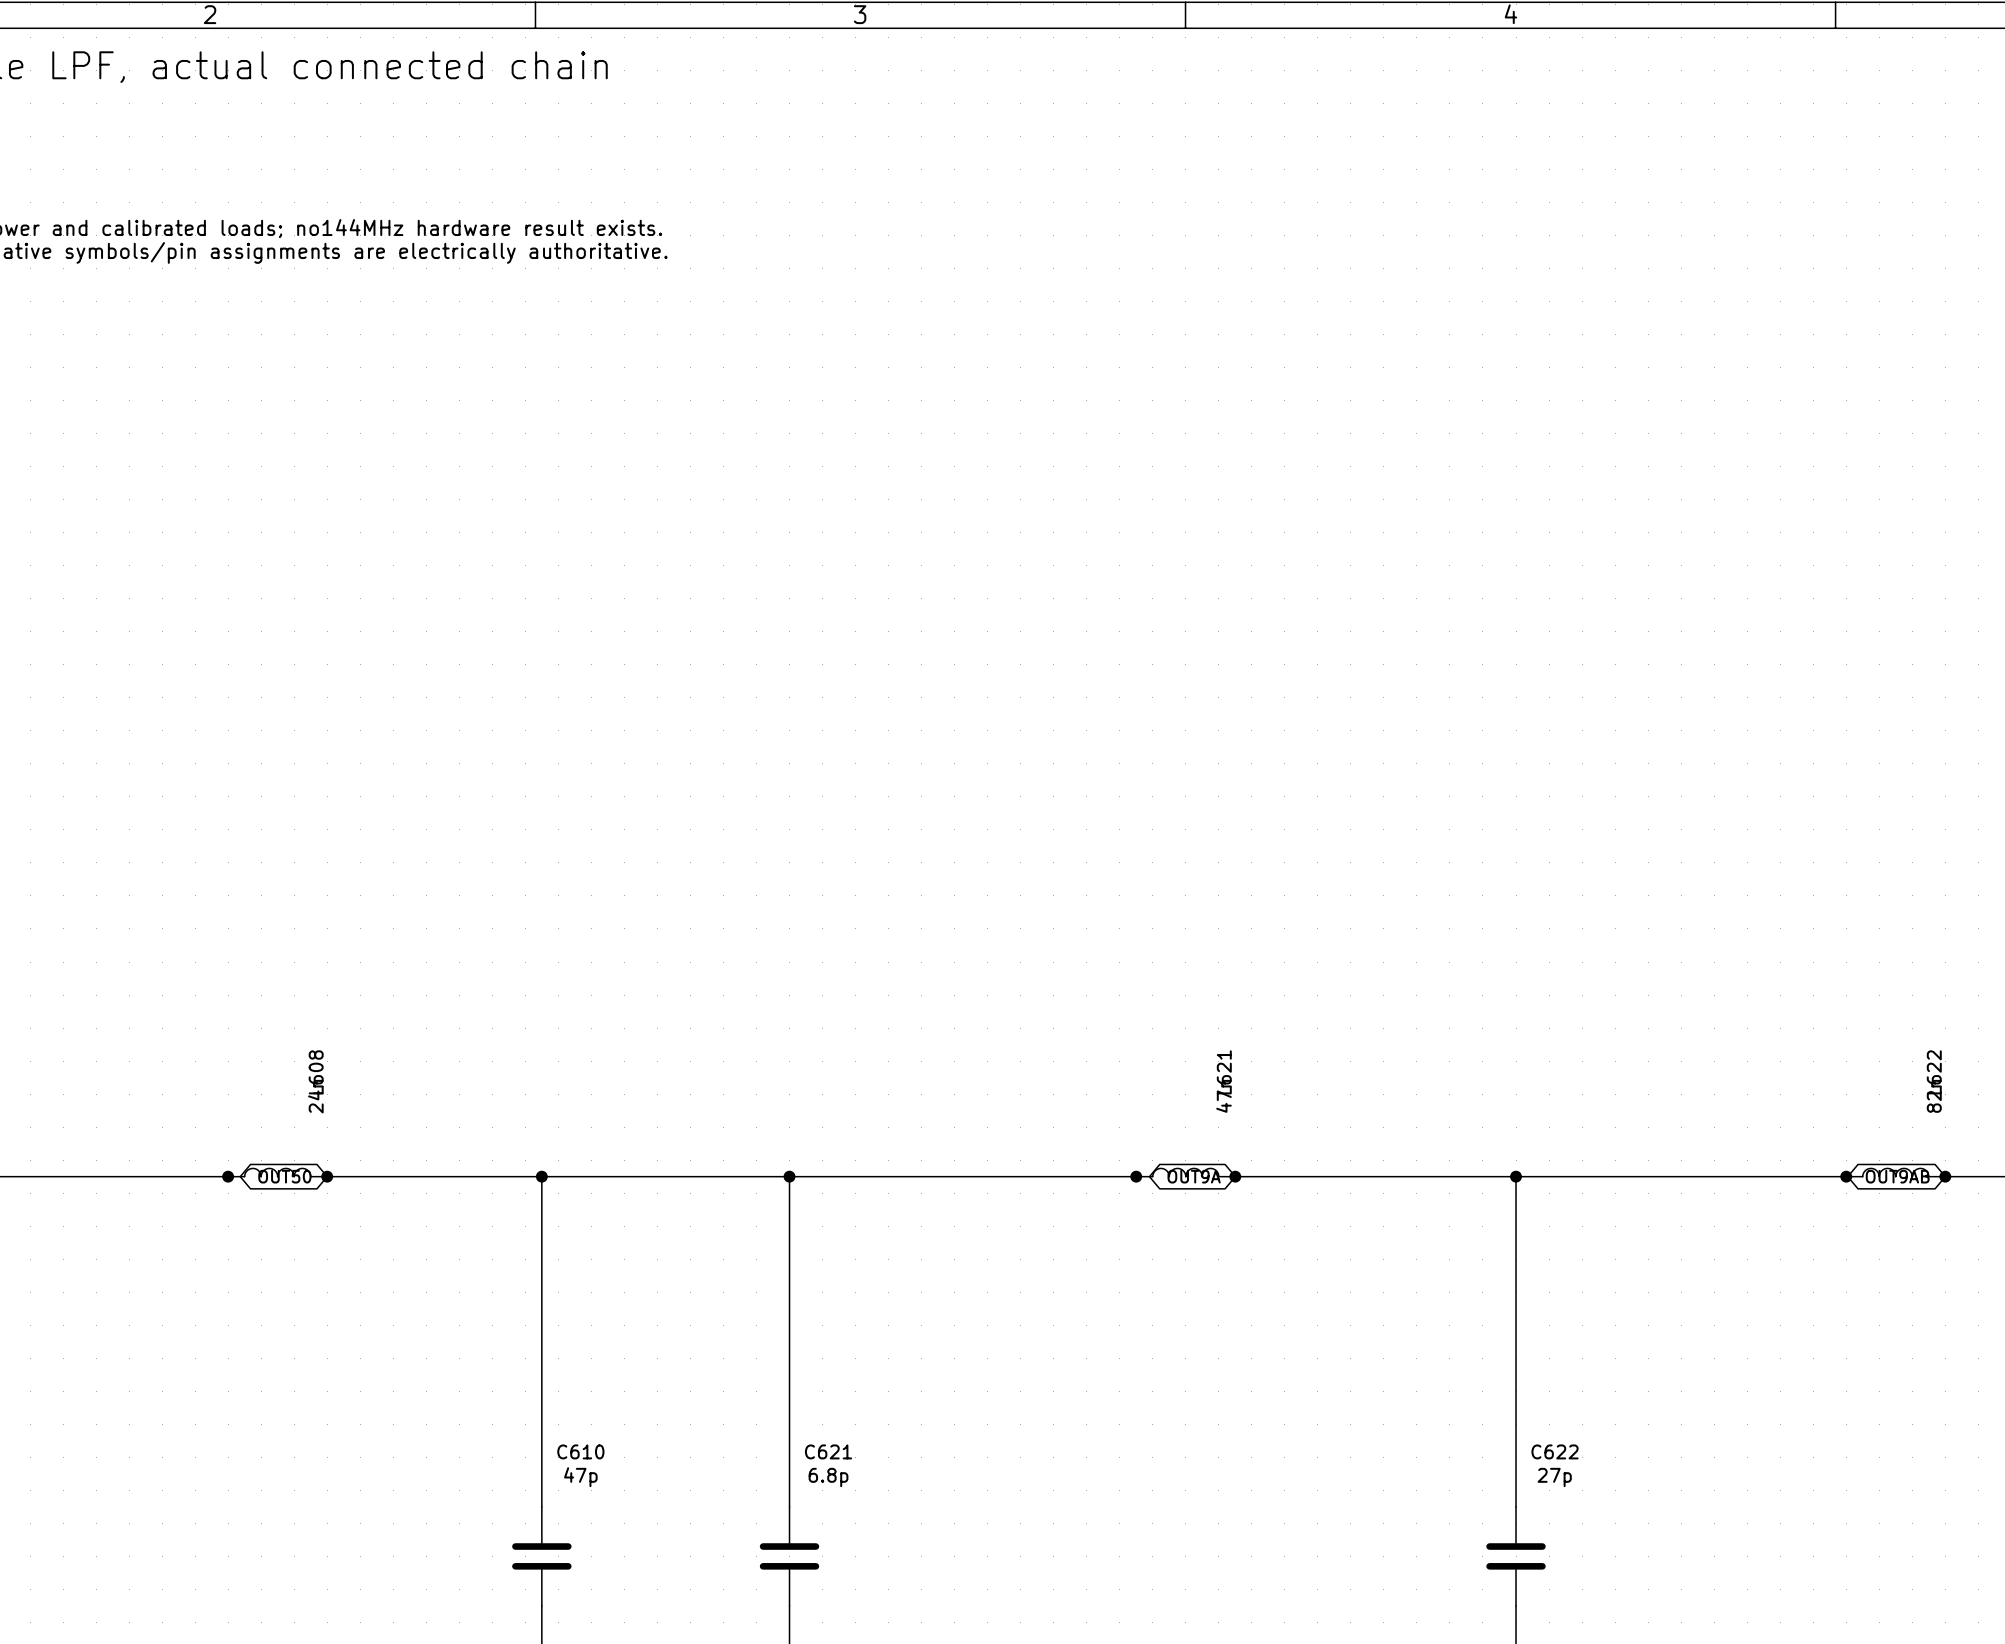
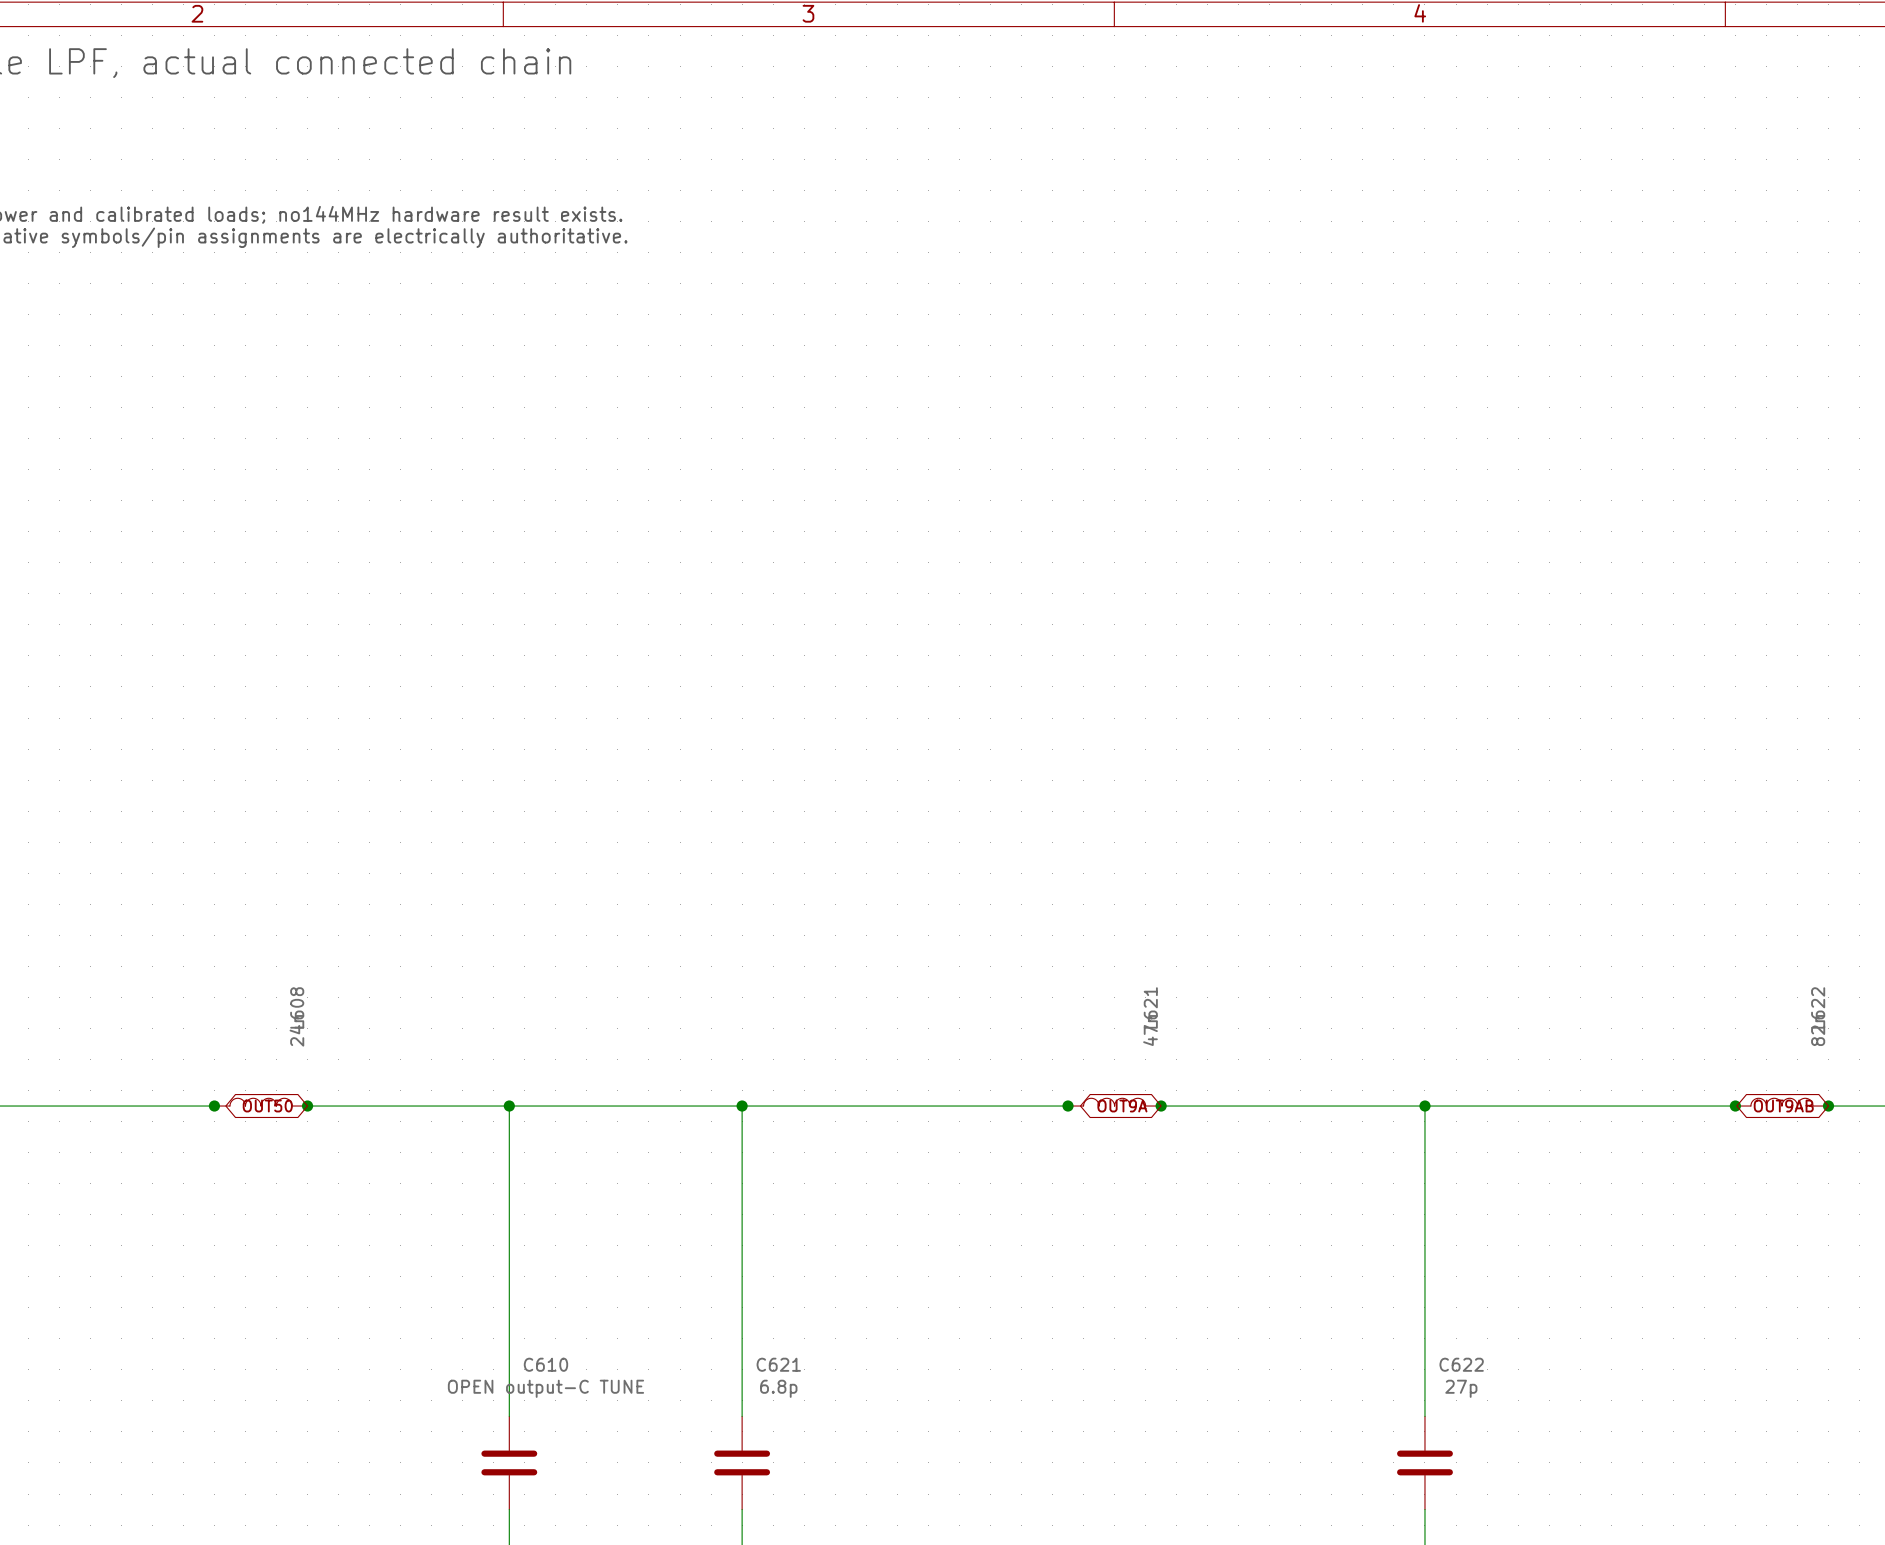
C610 value: 47p (580, 1477) -> OPEN output-C TUNE (545, 1388)

